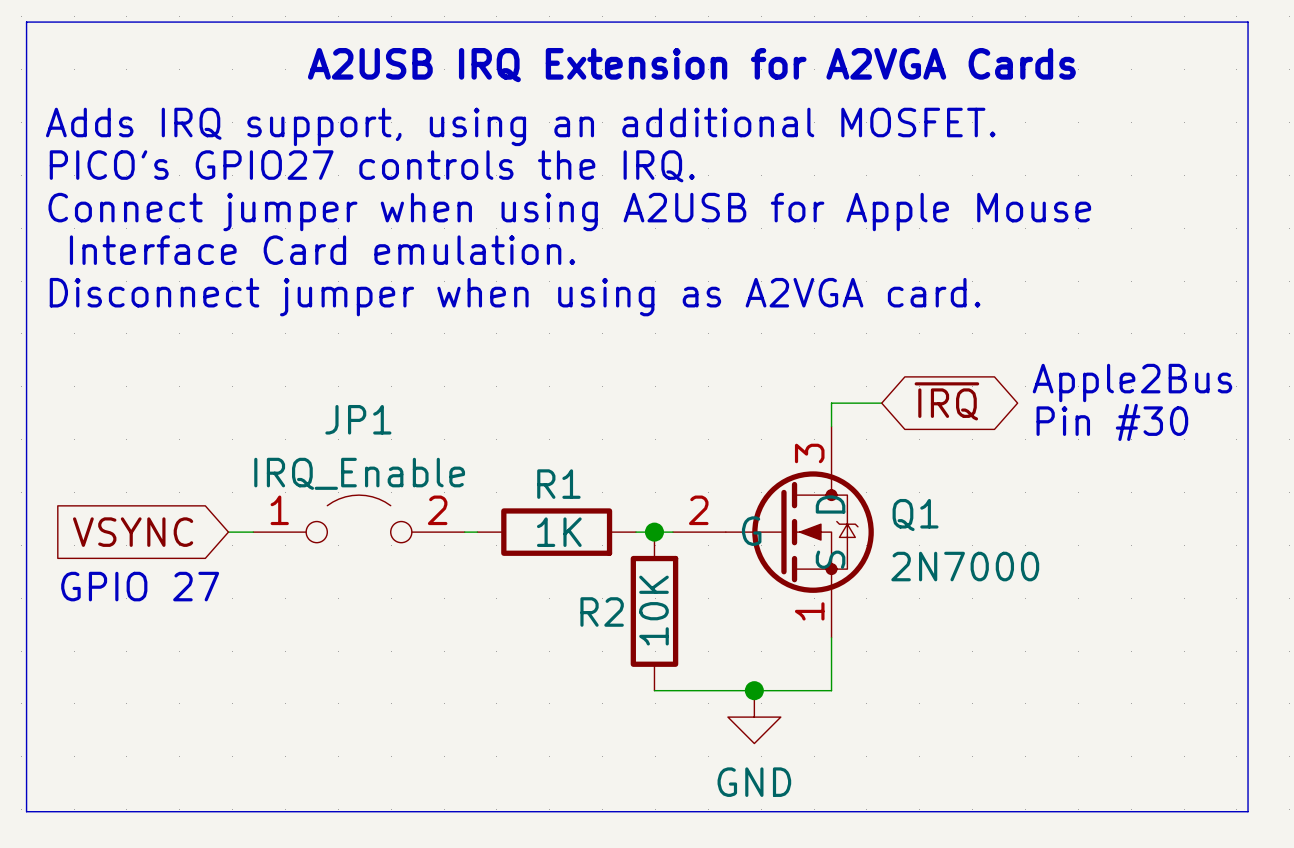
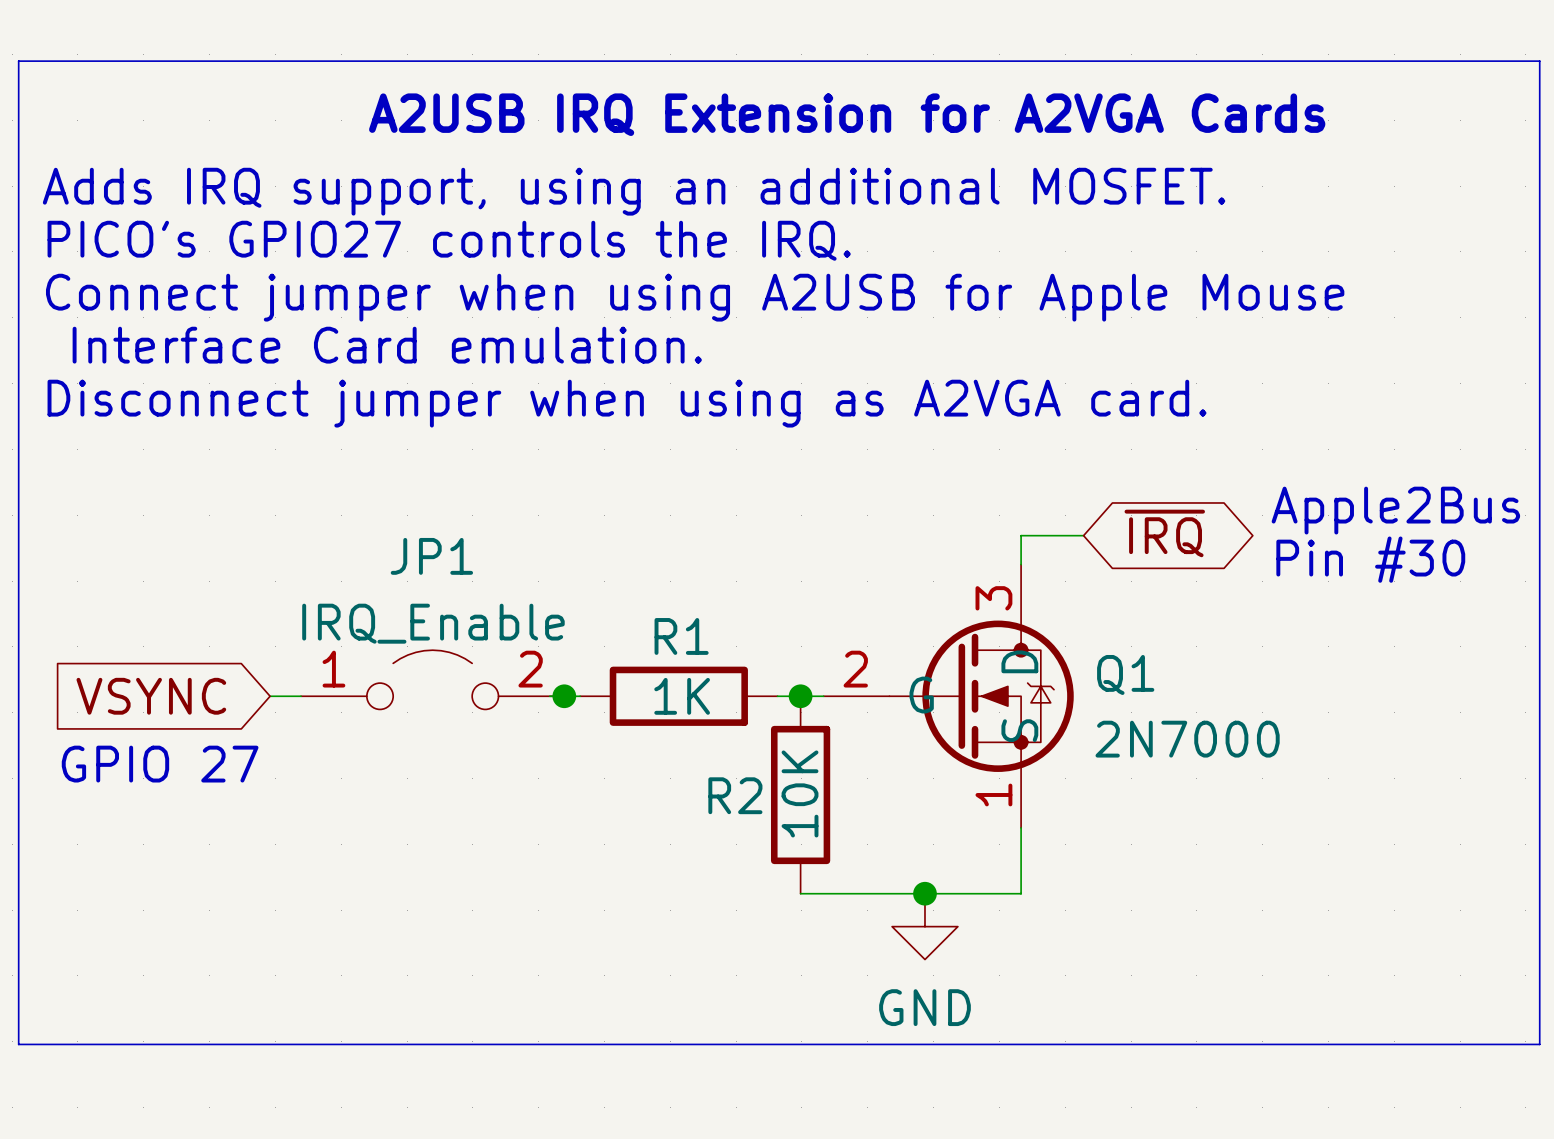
junction: none -> (564, 696)

